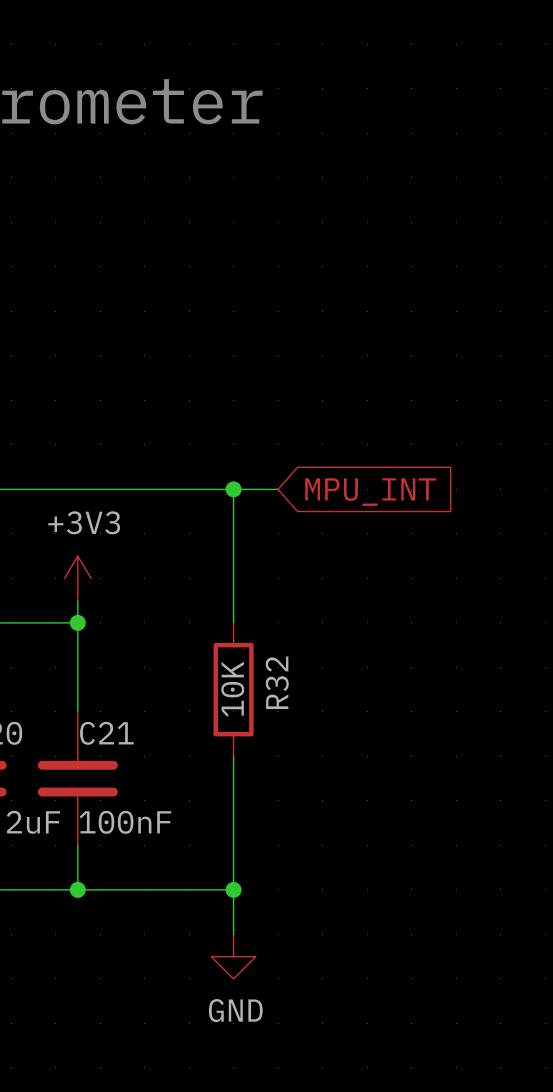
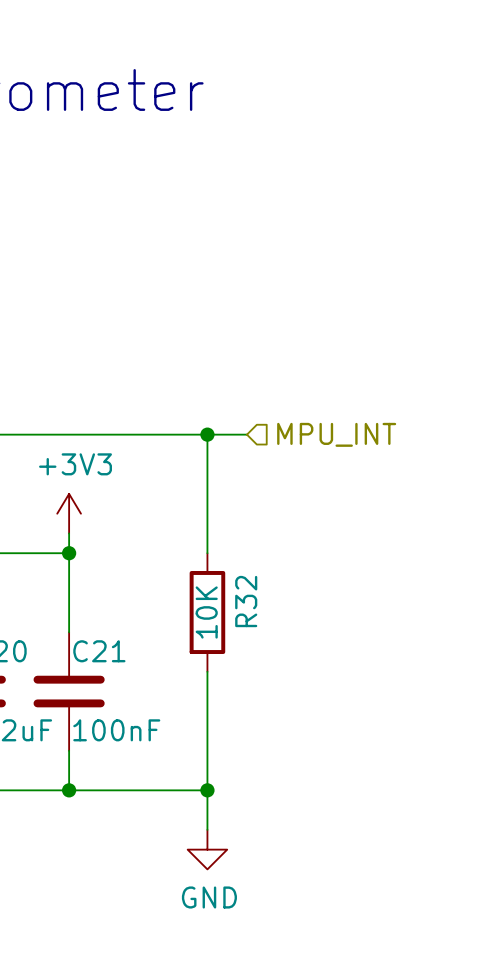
hierarchical label: none -> MPU_INT (336, 434)
global label: MPU_INT (370, 492) -> none

